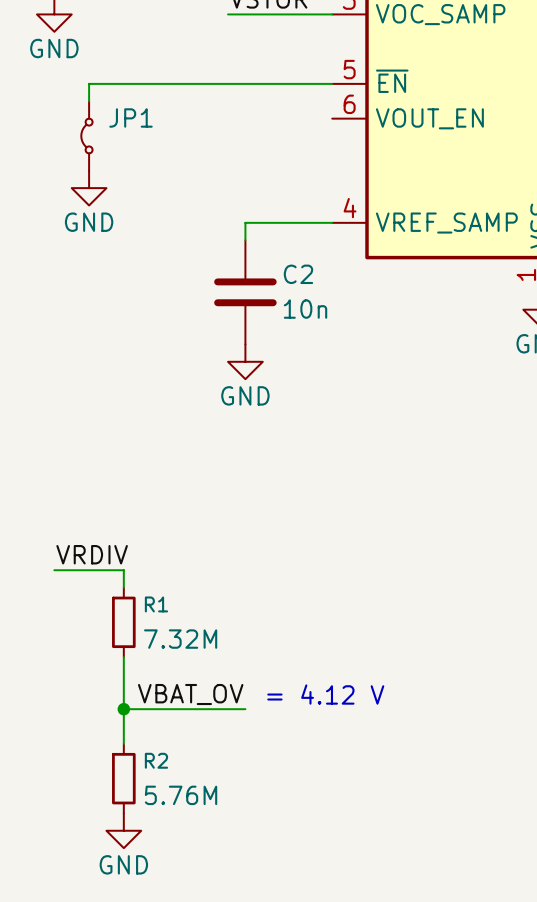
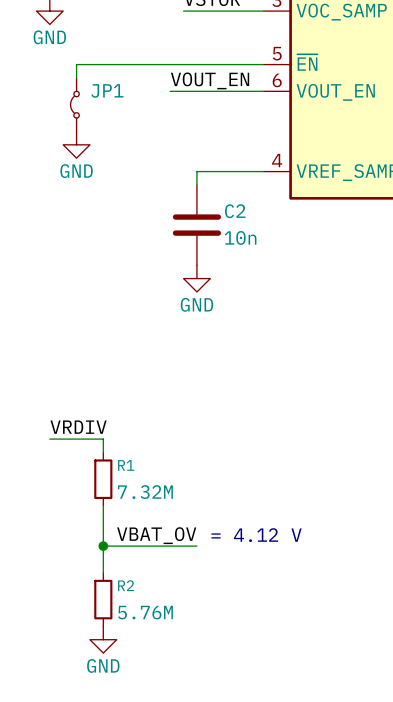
label: none -> VOUT_EN (210, 80)
wire: none -> (170, 91) (263, 91)

